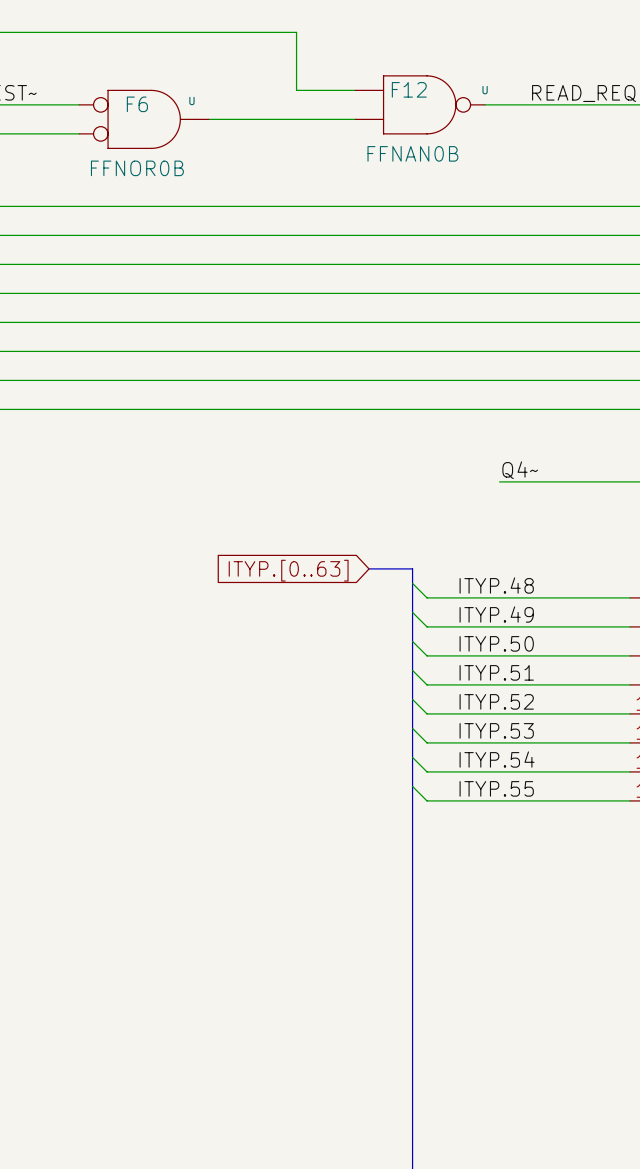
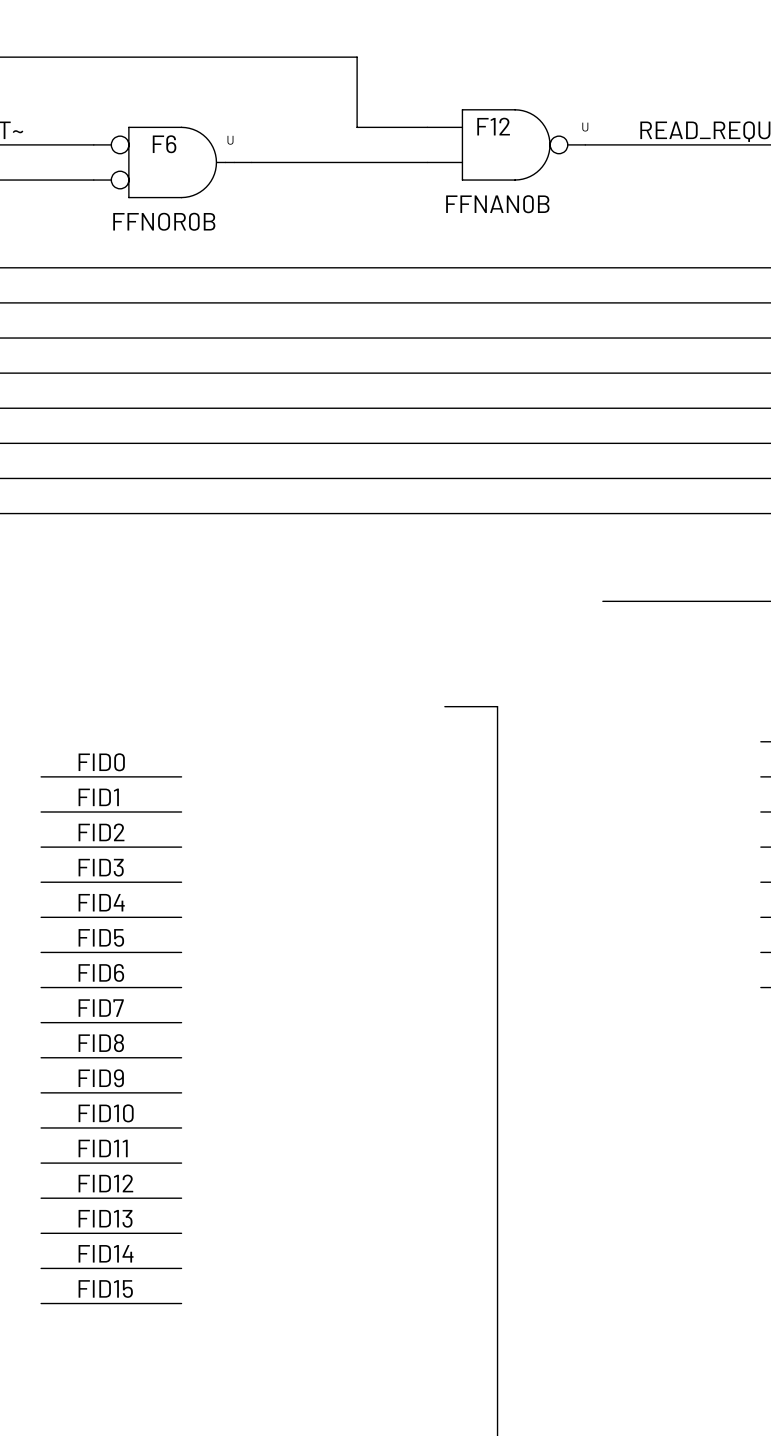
label: Q4~ (520, 470) -> none
global label: ITYP.[0..63] (288, 570) -> none
wire: (412, 583) (427, 597) (630, 597) -> none
label: ITYP.48 (496, 585) -> none
wire: (412, 612) (427, 626) (630, 626) -> none
label: none -> FID0 (101, 762)
label: ITYP.49 (496, 614) -> none
wire: none -> (41, 776) (181, 776)
wire: (412, 641) (427, 655) (630, 655) -> none
label: none -> FID1 (98, 797)
label: ITYP.50 (496, 643) -> none
wire: none -> (41, 811) (181, 811)
wire: (412, 670) (427, 684) (630, 684) -> none
label: none -> FID2 (101, 832)
label: ITYP.51 (496, 672) -> none
wire: none -> (41, 847) (181, 847)
wire: (412, 699) (427, 713) (630, 713) -> none
label: none -> FID3 (101, 867)
label: ITYP.52 (496, 701) -> none
wire: none -> (41, 882) (181, 882)
wire: (412, 728) (427, 742) (630, 742) -> none
label: none -> FID4 (101, 902)
label: ITYP.53 (496, 730) -> none
wire: none -> (41, 917) (181, 917)
wire: (412, 757) (427, 771) (630, 771) -> none
label: none -> FID5 (101, 937)
label: ITYP.54 (497, 759) -> none
wire: none -> (41, 952) (181, 952)
wire: (412, 786) (427, 800) (630, 800) -> none
label: none -> FID6 (101, 972)
label: ITYP.55 (496, 788) -> none
wire: none -> (41, 987) (181, 987)
label: none -> FID7 (101, 1008)
wire: none -> (41, 1022) (181, 1022)
label: none -> FID8 (101, 1043)
wire: none -> (41, 1057) (181, 1057)
label: none -> FID9 (101, 1078)
wire: none -> (41, 1092) (181, 1092)
label: none -> FID10 (106, 1113)
wire: none -> (41, 1127) (181, 1127)
label: none -> FID11 (103, 1148)
wire: none -> (41, 1163) (181, 1163)
label: none -> FID12 (105, 1183)
wire: none -> (41, 1198) (181, 1198)
label: none -> FID13 (105, 1218)
wire: none -> (41, 1233) (181, 1233)
label: none -> FID14 (106, 1253)
wire: none -> (41, 1268) (181, 1268)
label: none -> FID15 (105, 1289)
wire: none -> (41, 1303) (181, 1303)

